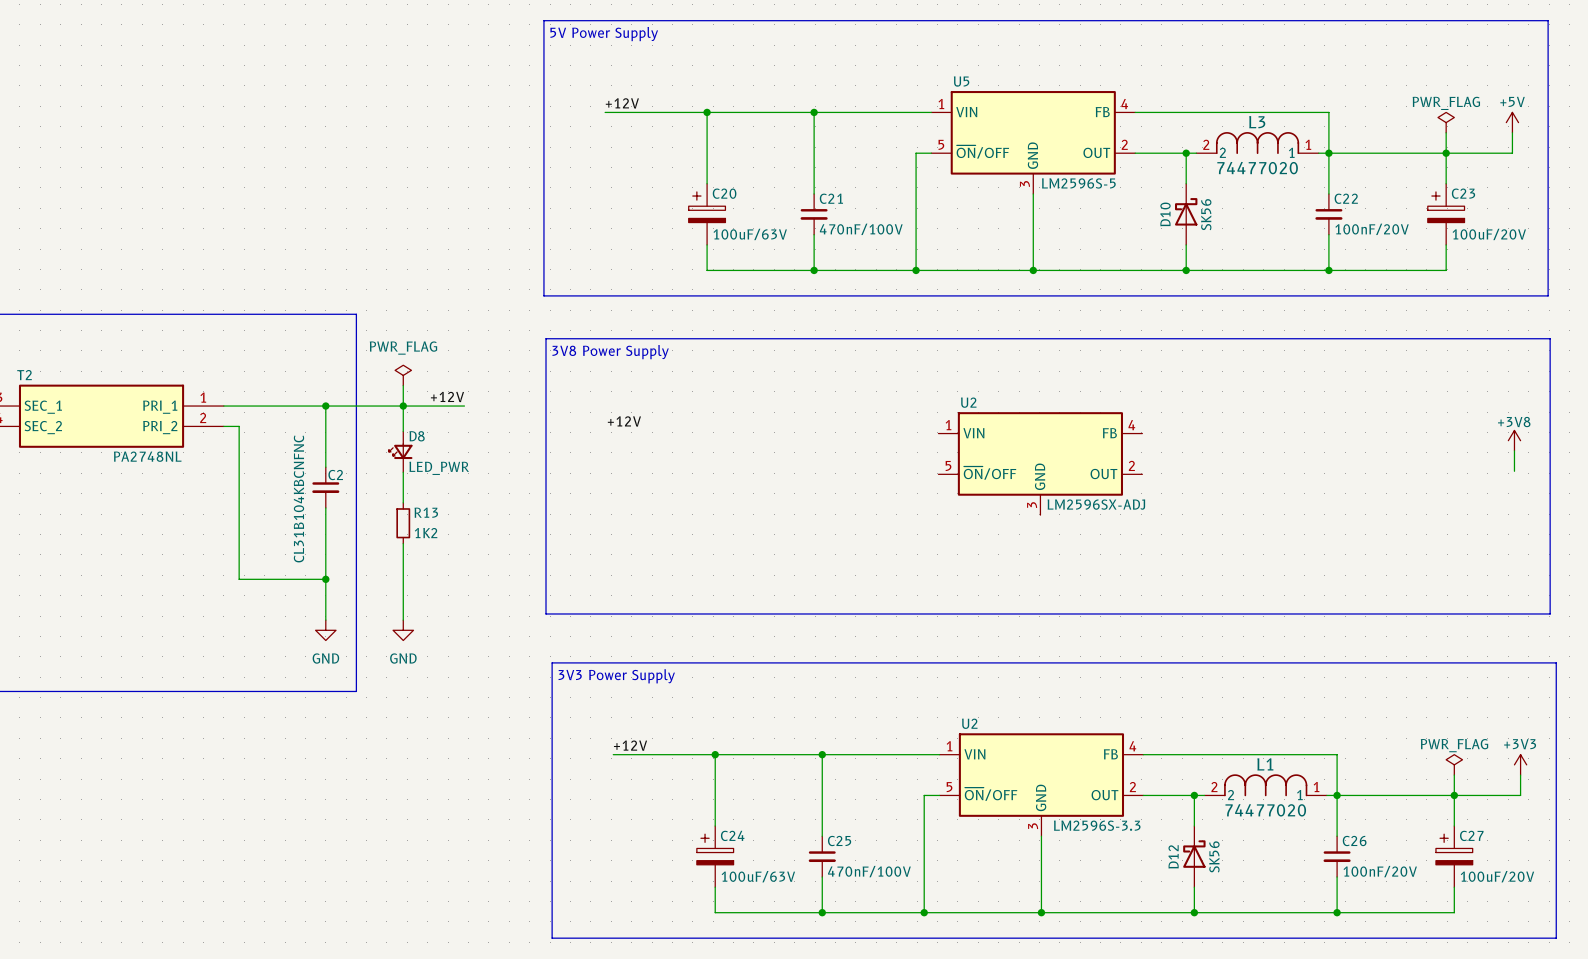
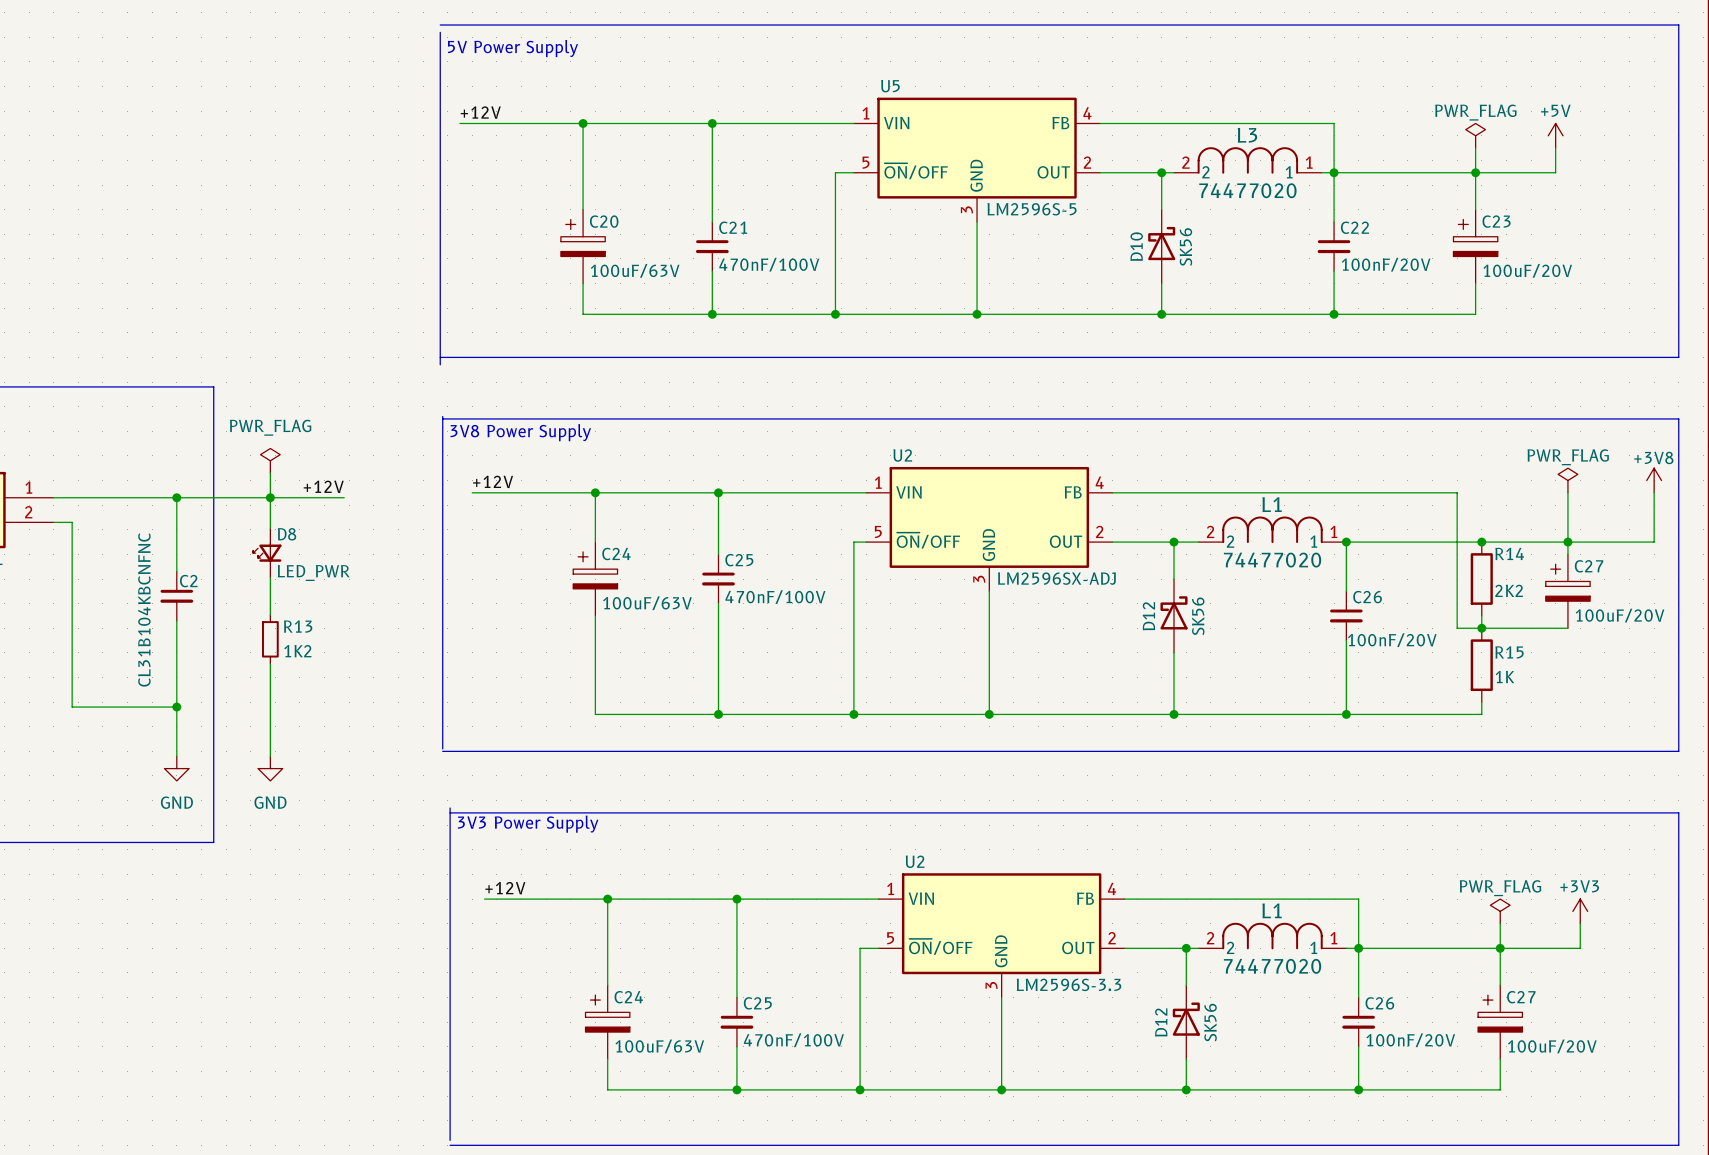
line: none -> (440, 25) (1678, 25) (1678, 357) (440, 357)
line: (543, 20) (1548, 20) (1548, 295) (543, 295) -> none
junction: none -> (583, 123)
junction: none -> (712, 123)
label position: +12V (622, 103) -> +12V (480, 112)
wire: (605, 112) (931, 112) -> (459, 123) (853, 123)
wire: (707, 112) (707, 183) -> (583, 123) (583, 209)
junction: (707, 112) -> none
wire: (814, 112) (814, 193) -> (712, 123) (712, 221)
junction: (814, 112) -> none
wire: (1135, 112) (1328, 112) (1328, 193) -> (1100, 123) (1334, 123) (1334, 221)
power symbol position: PWR_FLAG (1446, 122) -> PWR_FLAG (1475, 135)
power symbol position: +5V (1512, 122) -> +5V (1555, 135)
wire: (1446, 132) (1446, 183) -> (1475, 148) (1475, 209)
wire: (1512, 132) (1512, 153) (1318, 153) -> (1555, 148) (1555, 172) (1321, 172)
junction: none -> (1334, 172)
junction: none -> (1475, 172)
U5 position: (1033, 142) -> (977, 159)
L3 position: (1257, 143) -> (1247, 160)
wire: (931, 153) (916, 153) (916, 270) -> (853, 172) (835, 172) (835, 314)
wire: (1135, 153) (1196, 153) -> (1100, 172) (1174, 172)
wire: (1186, 153) (1186, 183) -> (1161, 172) (1161, 209)
junction position: (1186, 153) -> (1161, 172)
junction: (1328, 153) -> none
junction: (1446, 153) -> none
wire: (1033, 193) (1033, 270) -> (977, 221) (977, 314)
C20 position: (707, 214) -> (583, 246)
C21 position: (814, 214) -> (712, 246)
D10 position: (1186, 214) -> (1161, 246)
C22 position: (1328, 214) -> (1334, 246)
C23 position: (1446, 214) -> (1475, 246)
wire: (814, 234) (814, 270) -> (712, 271) (712, 314)
wire: (1328, 234) (1328, 270) -> (1334, 271) (1334, 314)
wire: (707, 244) (707, 270) (1446, 270) (1446, 244) -> (583, 283) (583, 314) (1475, 314) (1475, 283)
wire: (1186, 244) (1186, 270) -> (1161, 283) (1161, 314)
junction: none -> (712, 314)
junction: none -> (835, 314)
junction: none -> (977, 314)
junction: (814, 270) -> none
junction: (916, 270) -> none
junction: (1033, 270) -> none
junction position: (1186, 270) -> (1161, 314)
junction position: (1328, 270) -> (1334, 314)
line: (546, 338) (1550, 338) (1550, 613) (546, 613) -> none
line: none -> (442, 418) (1678, 418) (1678, 751) (442, 751)
power symbol: none -> PWR_FLAG (1567, 480)
wire: none -> (472, 492) (866, 492)
wire: none -> (595, 492) (595, 542)
junction: none -> (595, 492)
wire: none -> (718, 492) (718, 554)
junction: none -> (718, 492)
wire: none -> (1112, 492) (1457, 492) (1457, 628) (1567, 628)
wire: none -> (1567, 492) (1567, 554)
wire: none -> (1654, 492) (1654, 542) (1346, 542) (1346, 591)
label position: +12V (624, 421) -> +12V (493, 481)
L1: none -> 74477020 (1272, 529)
power symbol position: +3V8 (1514, 440) -> +3V8 (1654, 480)
wire: none -> (866, 542) (853, 542) (853, 714)
wire: none -> (1112, 542) (1198, 542)
wire: none -> (1174, 542) (1174, 579)
junction: none -> (1174, 542)
junction: none -> (1346, 542)
junction: none -> (1481, 542)
junction: none -> (1567, 542)
wire: (1514, 450) (1514, 471) -> none
U2 position: (1040, 463) -> (989, 529)
C24: none -> 100uF/63V (595, 579)
C25: none -> 470nF/100V (718, 579)
R14: none -> 2K2 (1481, 579)
wire: none -> (989, 591) (989, 714)
C27: none -> 100uF/20V (1567, 591)
wire: none -> (718, 603) (718, 714)
wire: none -> (595, 615) (595, 714) (1481, 714) (1481, 702)
D12: none -> SK56 (1174, 615)
C26: none -> 100nF/20V (1346, 615)
wire: none -> (1481, 615) (1481, 628)
junction: none -> (1481, 628)
wire: none -> (1346, 640) (1346, 714)
wire: none -> (1174, 652) (1174, 714)
R15: none -> 1K (1481, 665)
junction: none -> (718, 714)
junction: none -> (853, 714)
junction: none -> (989, 714)
junction: none -> (1174, 714)
junction: none -> (1346, 714)
line: (552, 662) (1556, 662) (1556, 938) (552, 938) -> none
line: none -> (450, 812) (1678, 812) (1678, 1145) (450, 1145)
label position: +12V (630, 745) -> +12V (505, 888)
wire: (613, 754) (939, 754) -> (484, 899) (878, 899)
wire: (715, 754) (715, 826) -> (607, 899) (607, 985)
junction position: (715, 754) -> (607, 899)
wire: (822, 754) (822, 836) -> (736, 899) (736, 997)
junction position: (822, 754) -> (736, 899)
wire: (1143, 754) (1337, 754) (1337, 836) -> (1124, 899) (1358, 899) (1358, 997)
power symbol position: PWR_FLAG (1454, 764) -> PWR_FLAG (1500, 911)
power symbol position: +3V3 (1520, 764) -> +3V3 (1580, 911)
wire: (1454, 775) (1454, 826) -> (1500, 923) (1500, 985)
wire: (1520, 775) (1520, 795) (1326, 795) -> (1580, 923) (1580, 948) (1346, 948)
U2 position: (1041, 784) -> (1001, 935)
L1 position: (1265, 785) -> (1272, 936)
wire: (939, 795) (924, 795) (924, 912) -> (878, 948) (860, 948) (860, 1089)
wire: (1143, 795) (1204, 795) -> (1124, 948) (1198, 948)
wire: (1194, 795) (1194, 826) -> (1186, 948) (1186, 985)
junction position: (1194, 795) -> (1186, 948)
junction position: (1337, 795) -> (1358, 948)
junction position: (1454, 795) -> (1500, 948)
wire: (1041, 836) (1041, 912) -> (1001, 997) (1001, 1089)
C24 position: (715, 856) -> (607, 1022)
C25 position: (822, 856) -> (736, 1022)
D12 position: (1194, 856) -> (1186, 1022)
C26 position: (1337, 856) -> (1358, 1022)
C27 position: (1454, 856) -> (1500, 1022)
wire: (822, 877) (822, 912) -> (736, 1046) (736, 1089)
wire: (1337, 877) (1337, 912) -> (1358, 1046) (1358, 1089)
wire: (715, 887) (715, 912) (1454, 912) (1454, 887) -> (607, 1059) (607, 1089) (1500, 1089) (1500, 1059)
wire: (1194, 887) (1194, 912) -> (1186, 1059) (1186, 1089)
junction: none -> (736, 1089)
junction: none -> (860, 1089)
junction: (822, 912) -> none
junction: (924, 912) -> none
junction position: (1041, 912) -> (1001, 1089)
junction position: (1194, 912) -> (1186, 1089)
junction position: (1337, 912) -> (1358, 1089)

